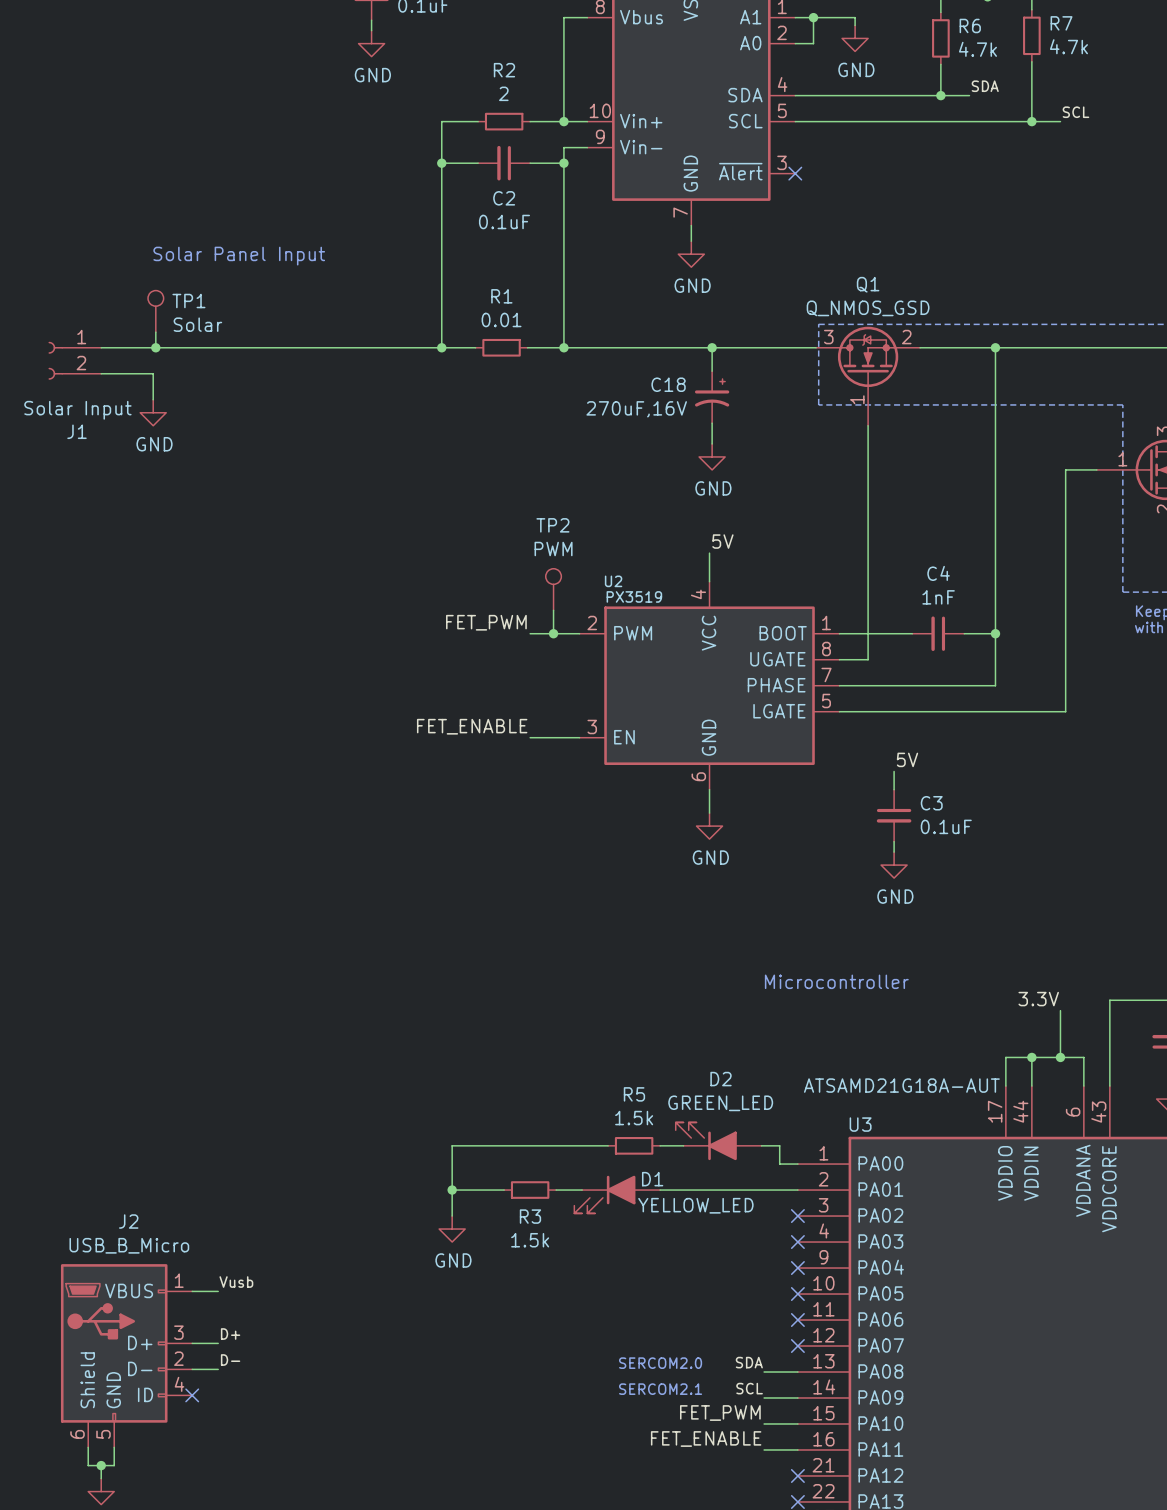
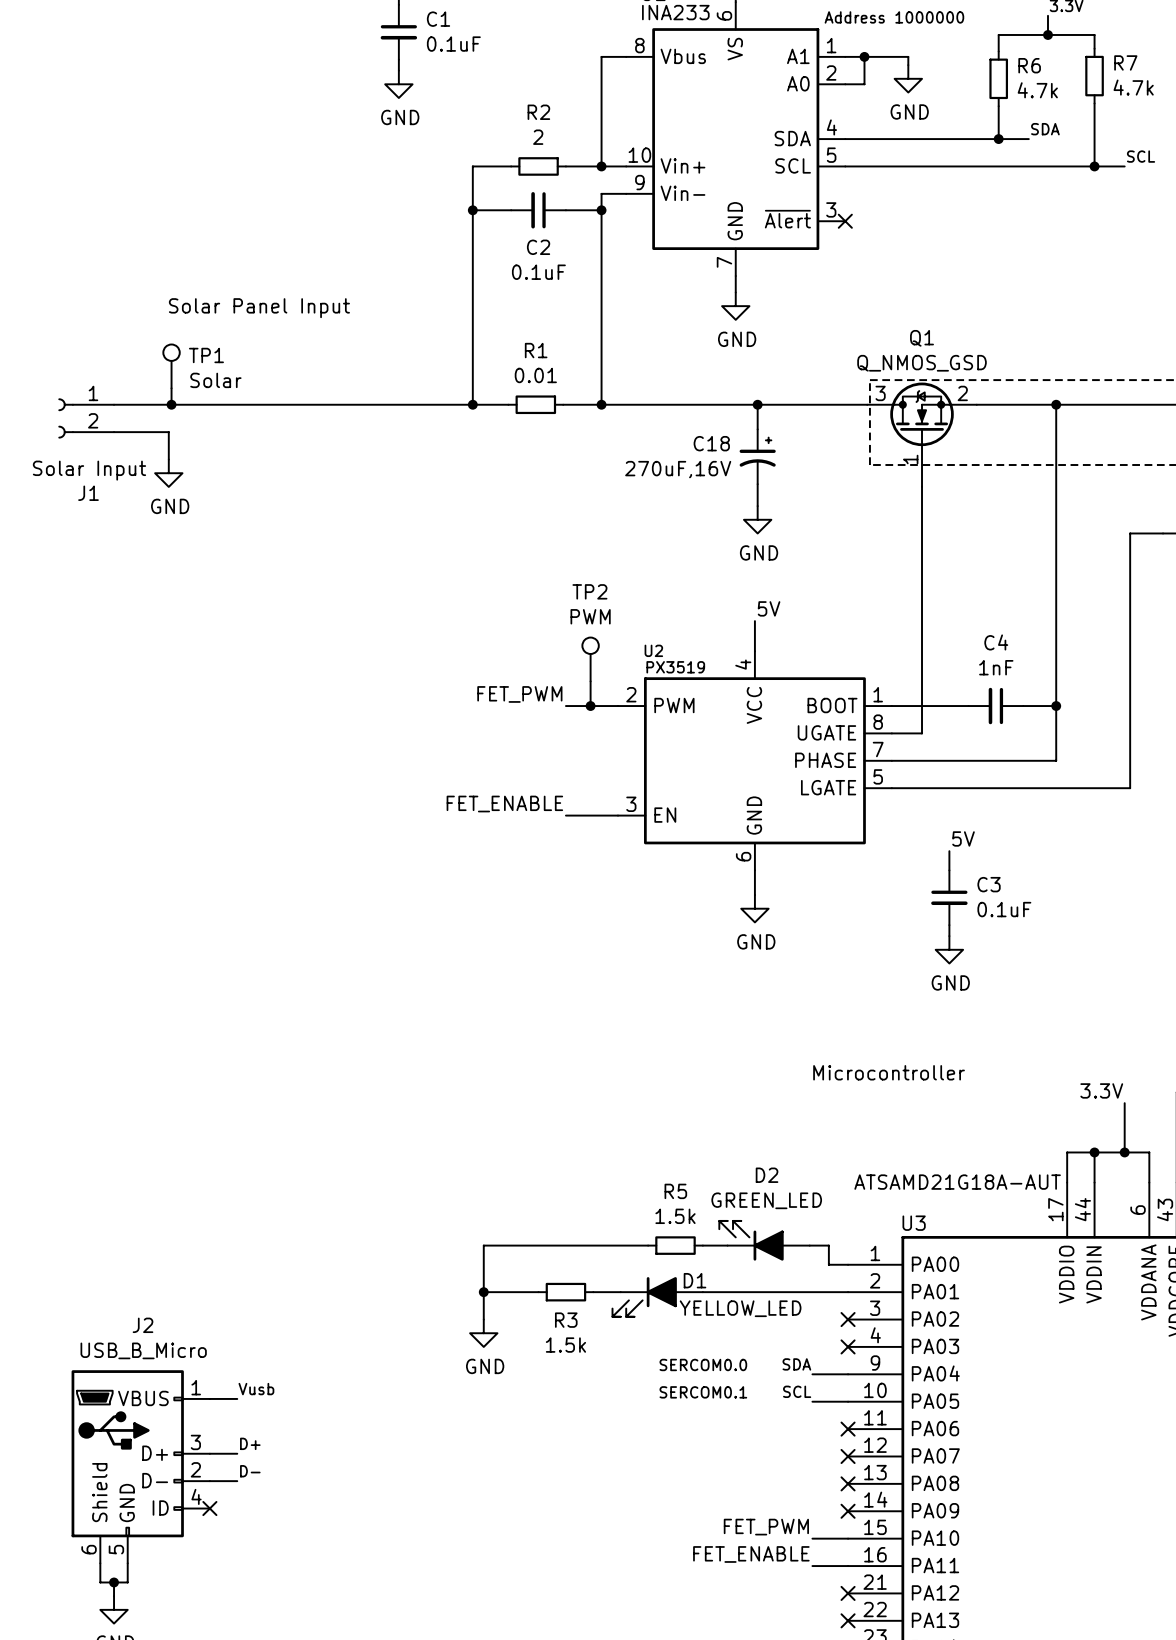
text: none -> SERCOM0.0 (703, 1364)
no-connect mark: (797, 1268) -> none
text: none -> SERCOM0.1 (703, 1392)
no-connect mark: (797, 1294) -> none
label position: SDA (749, 1362) -> SDA (796, 1364)
text: SERCOM2.0 (660, 1363) -> none
wire: (764, 1372) (797, 1372) -> (812, 1401) (848, 1401)
no-connect mark: none -> (848, 1483)
label position: SCL (749, 1388) -> SCL (797, 1391)
text: SERCOM2.1 (660, 1389) -> none
wire: (764, 1397) (797, 1397) -> (812, 1374) (848, 1374)
no-connect mark: none -> (848, 1511)

